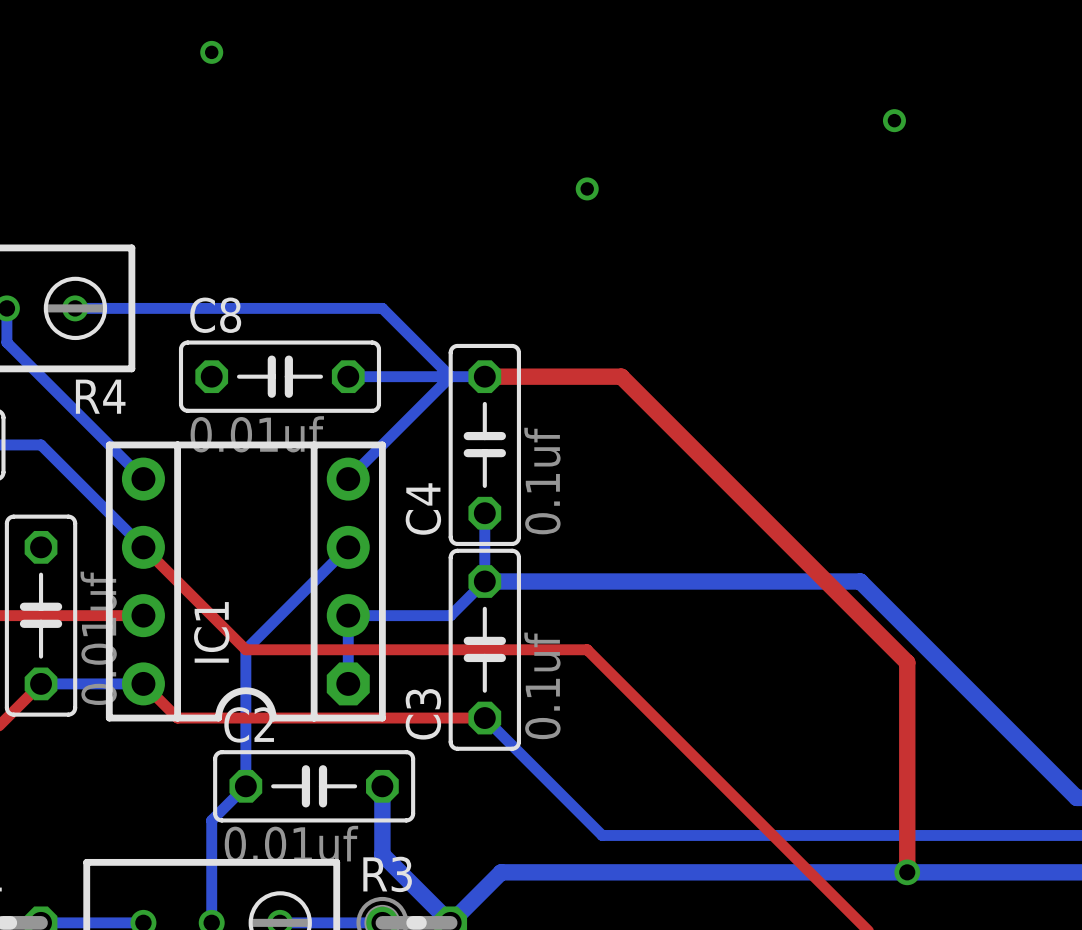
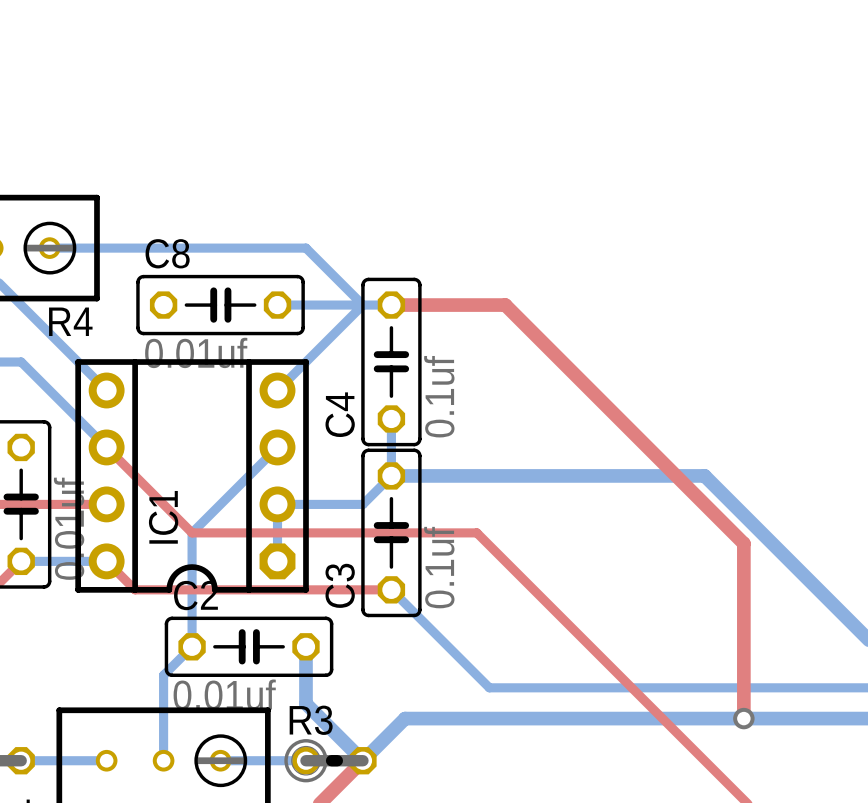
via: (211, 52) -> none
via: (894, 120) -> none
via: (587, 188) -> none

